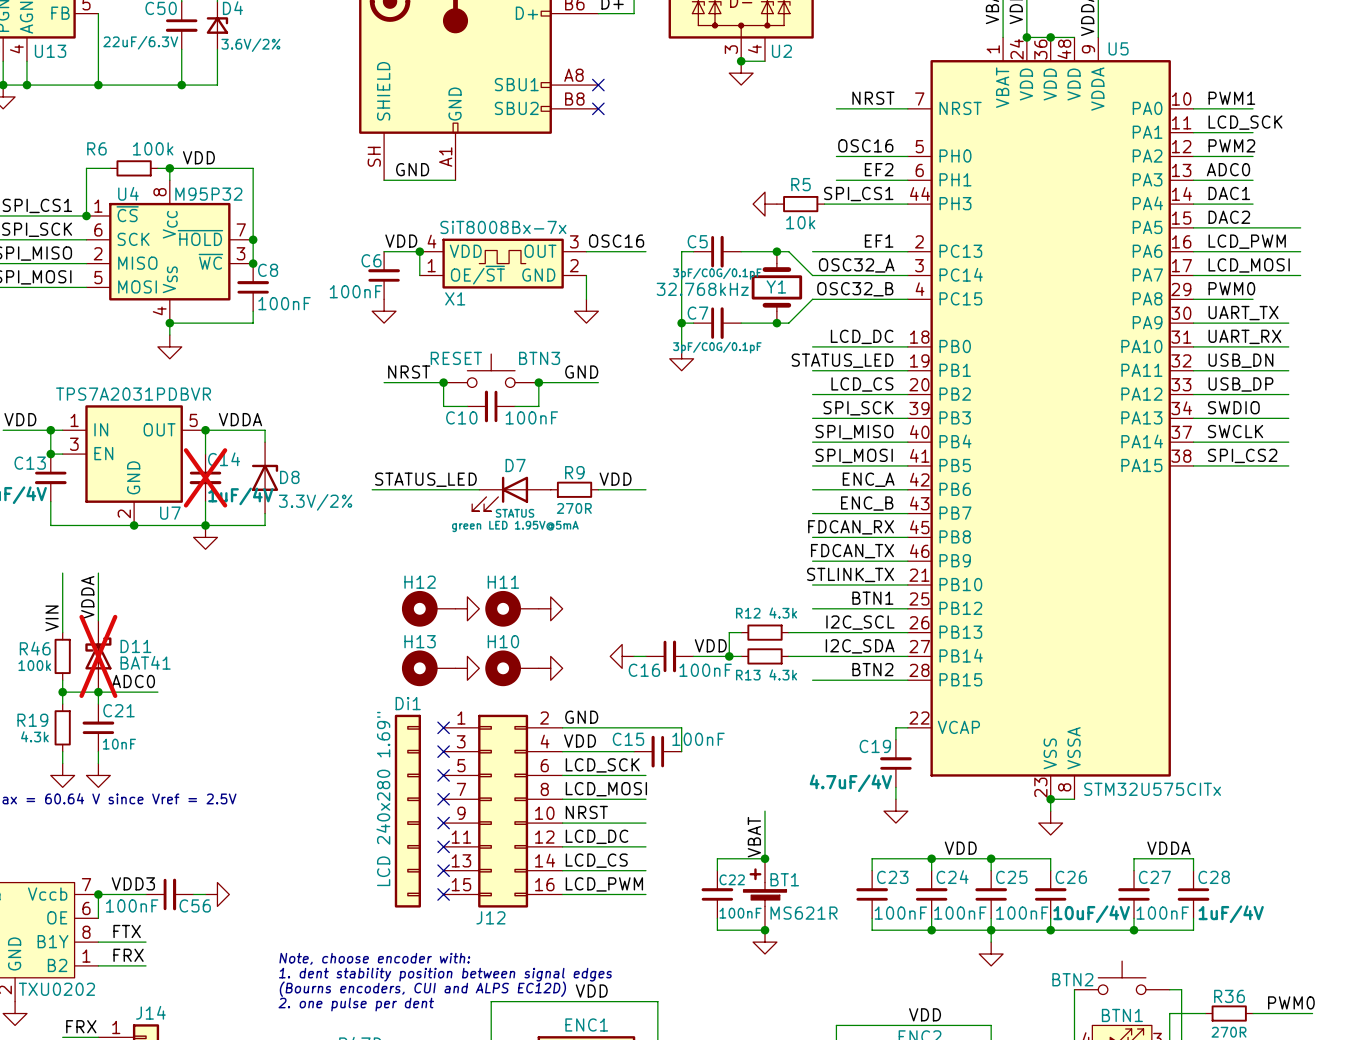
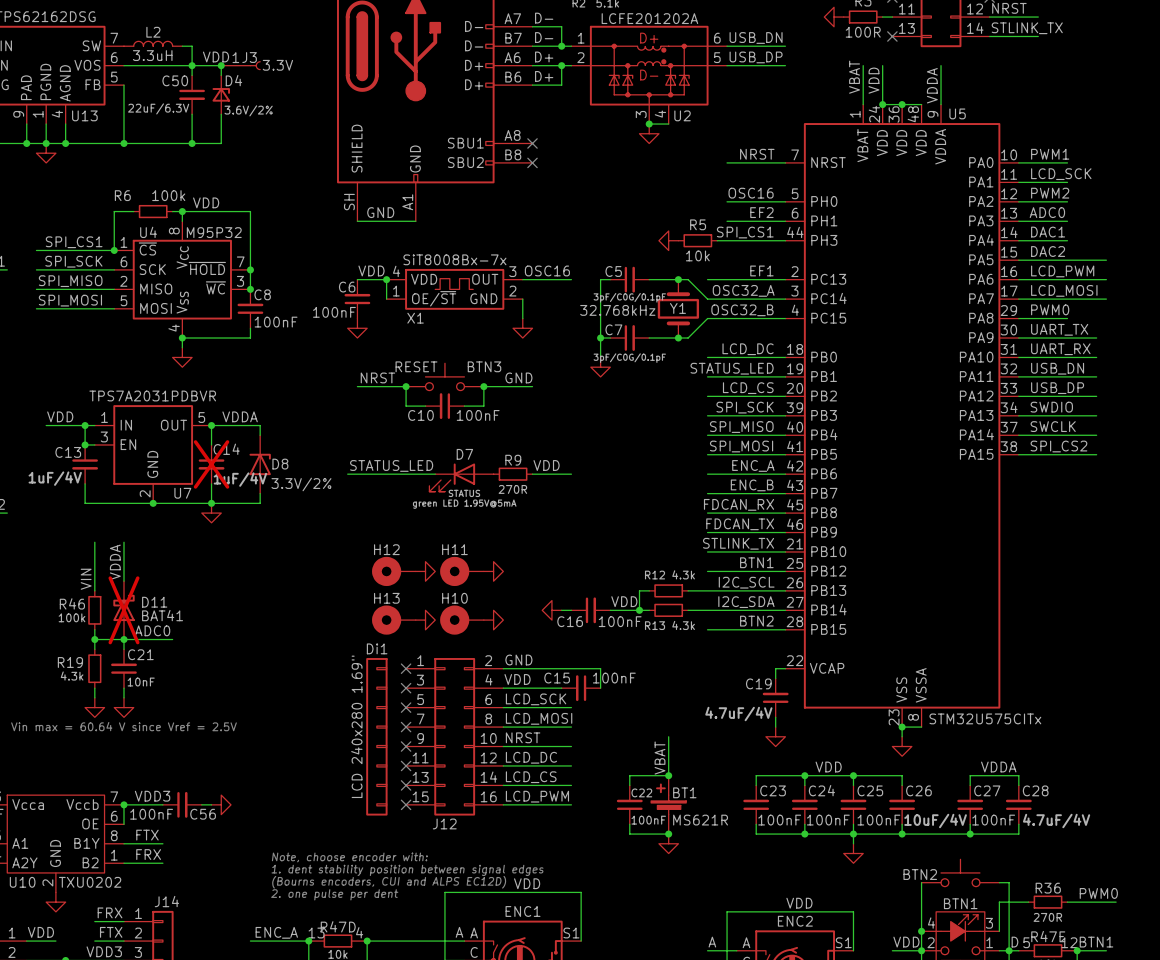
C28 rotation: 0° (1193, 894) -> 180° (1018, 804)
C28 value: 1uF/4V (1231, 914) -> 4.7uF/4V (1056, 821)

